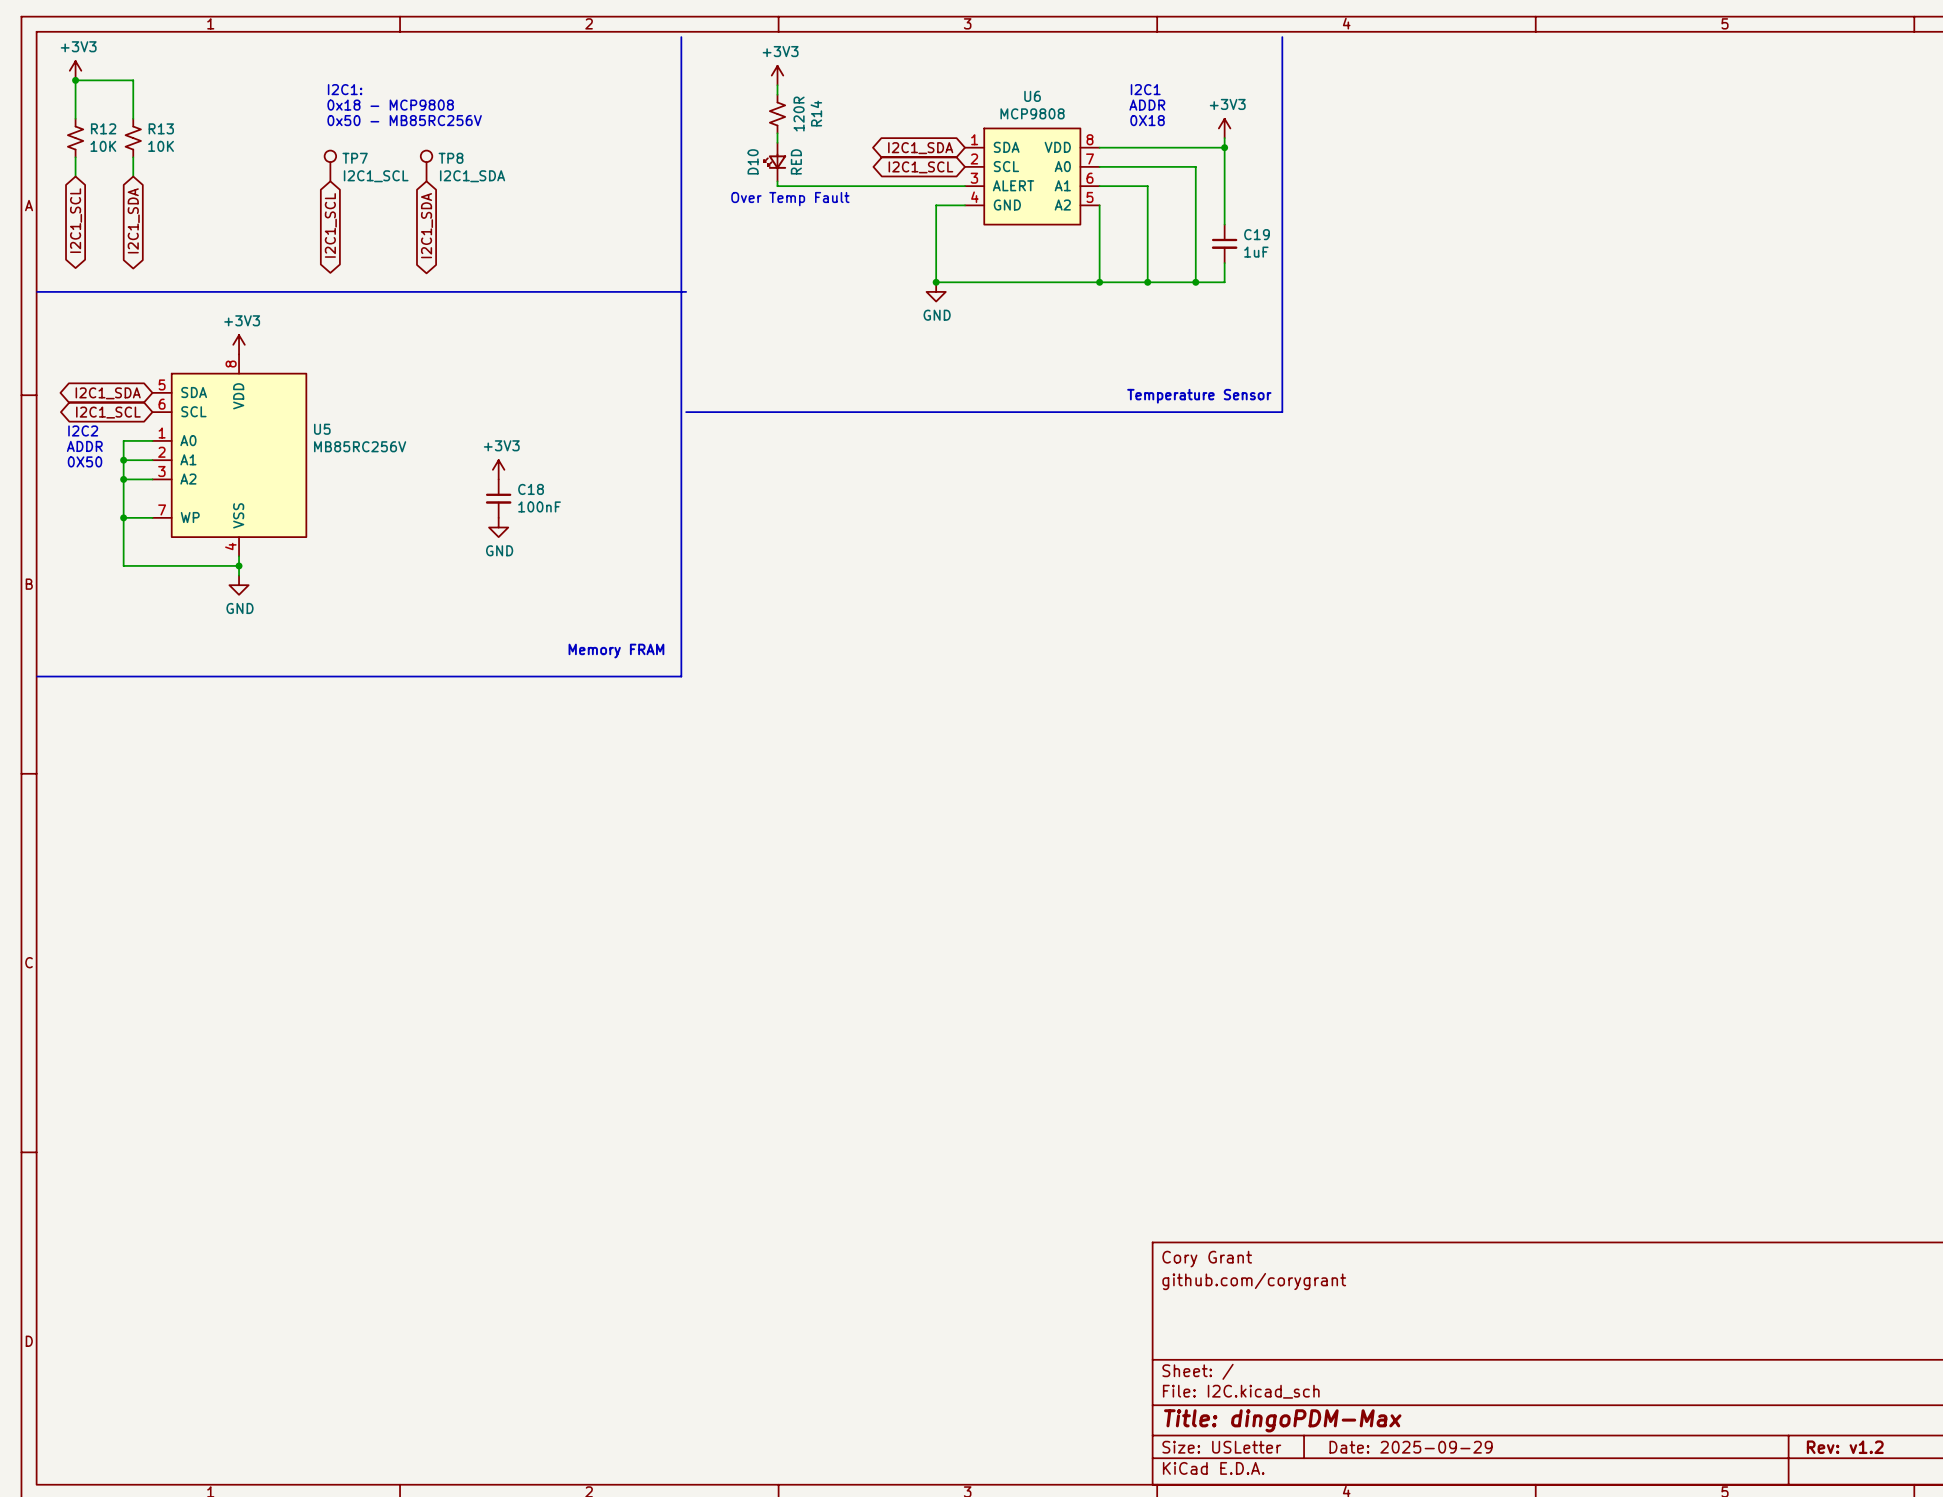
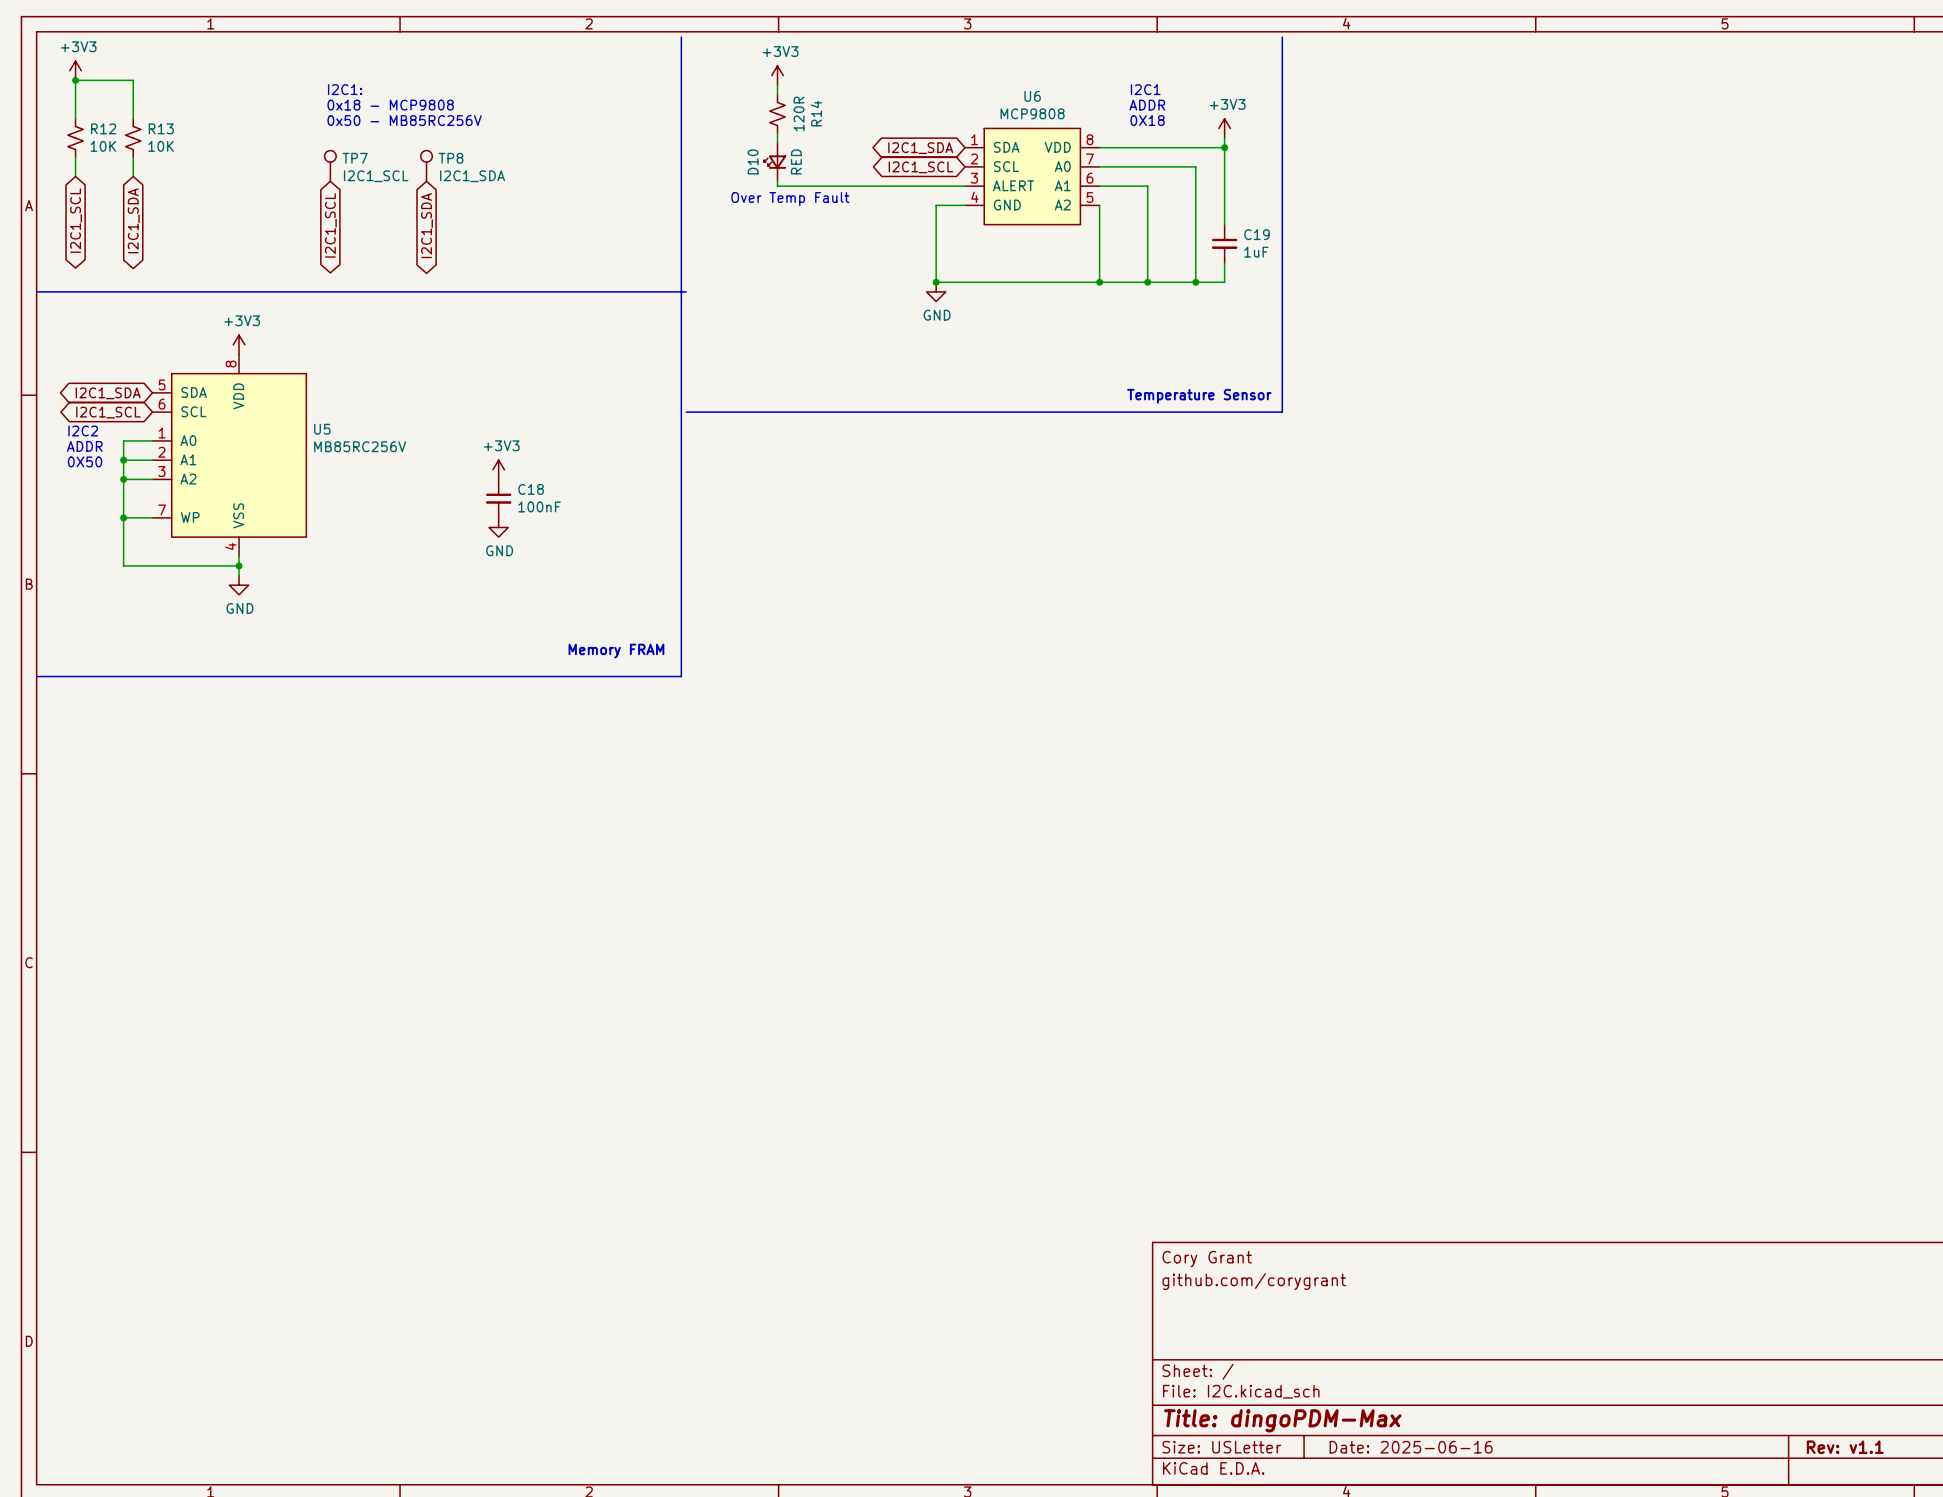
title block: Date: 2025-09-29 (1411, 1447) -> Date: 2025-06-16 (1411, 1447)
title block: Rev: v1.2 (1845, 1447) -> Rev: v1.1 (1845, 1447)

